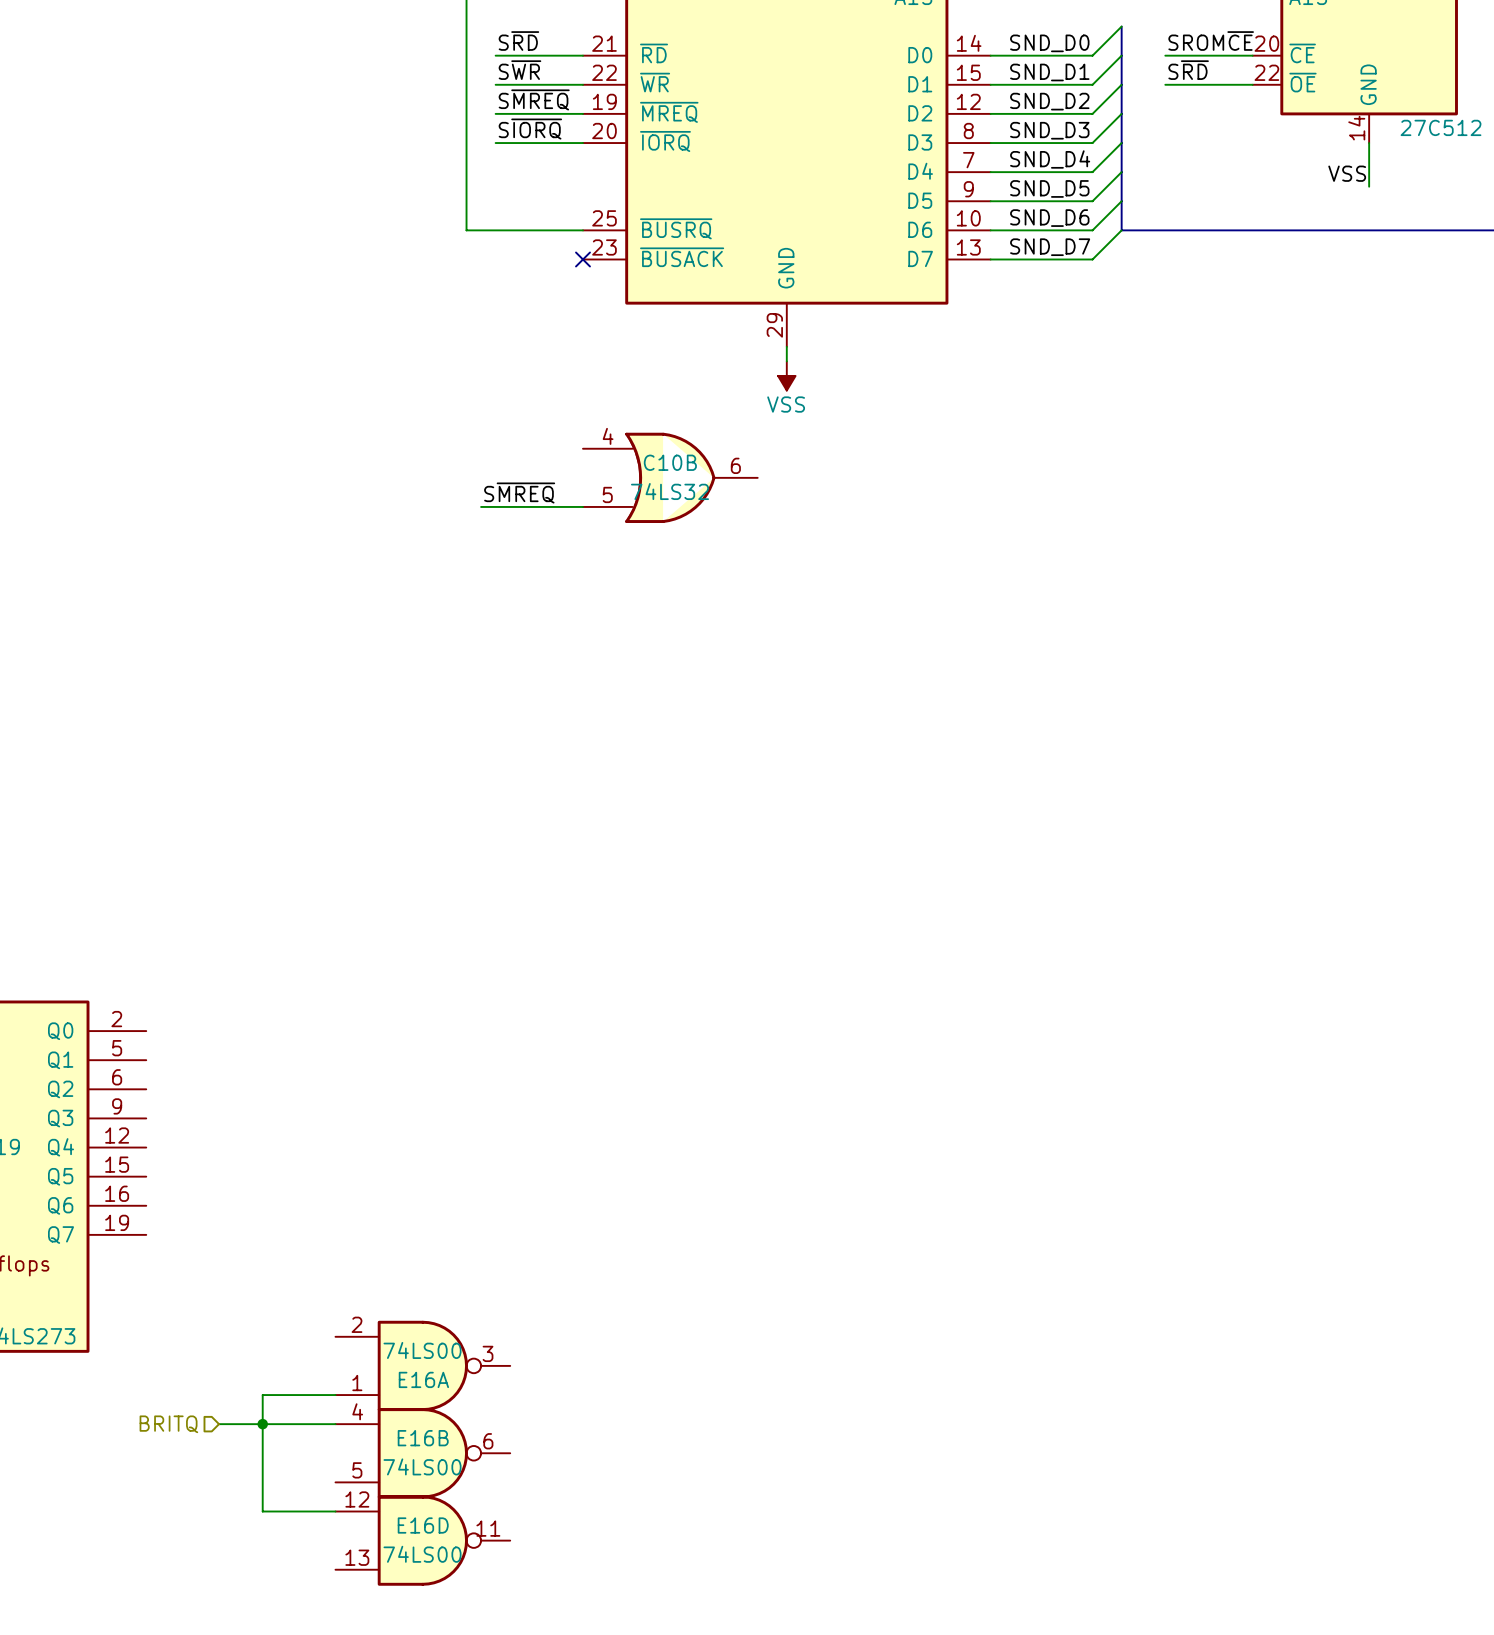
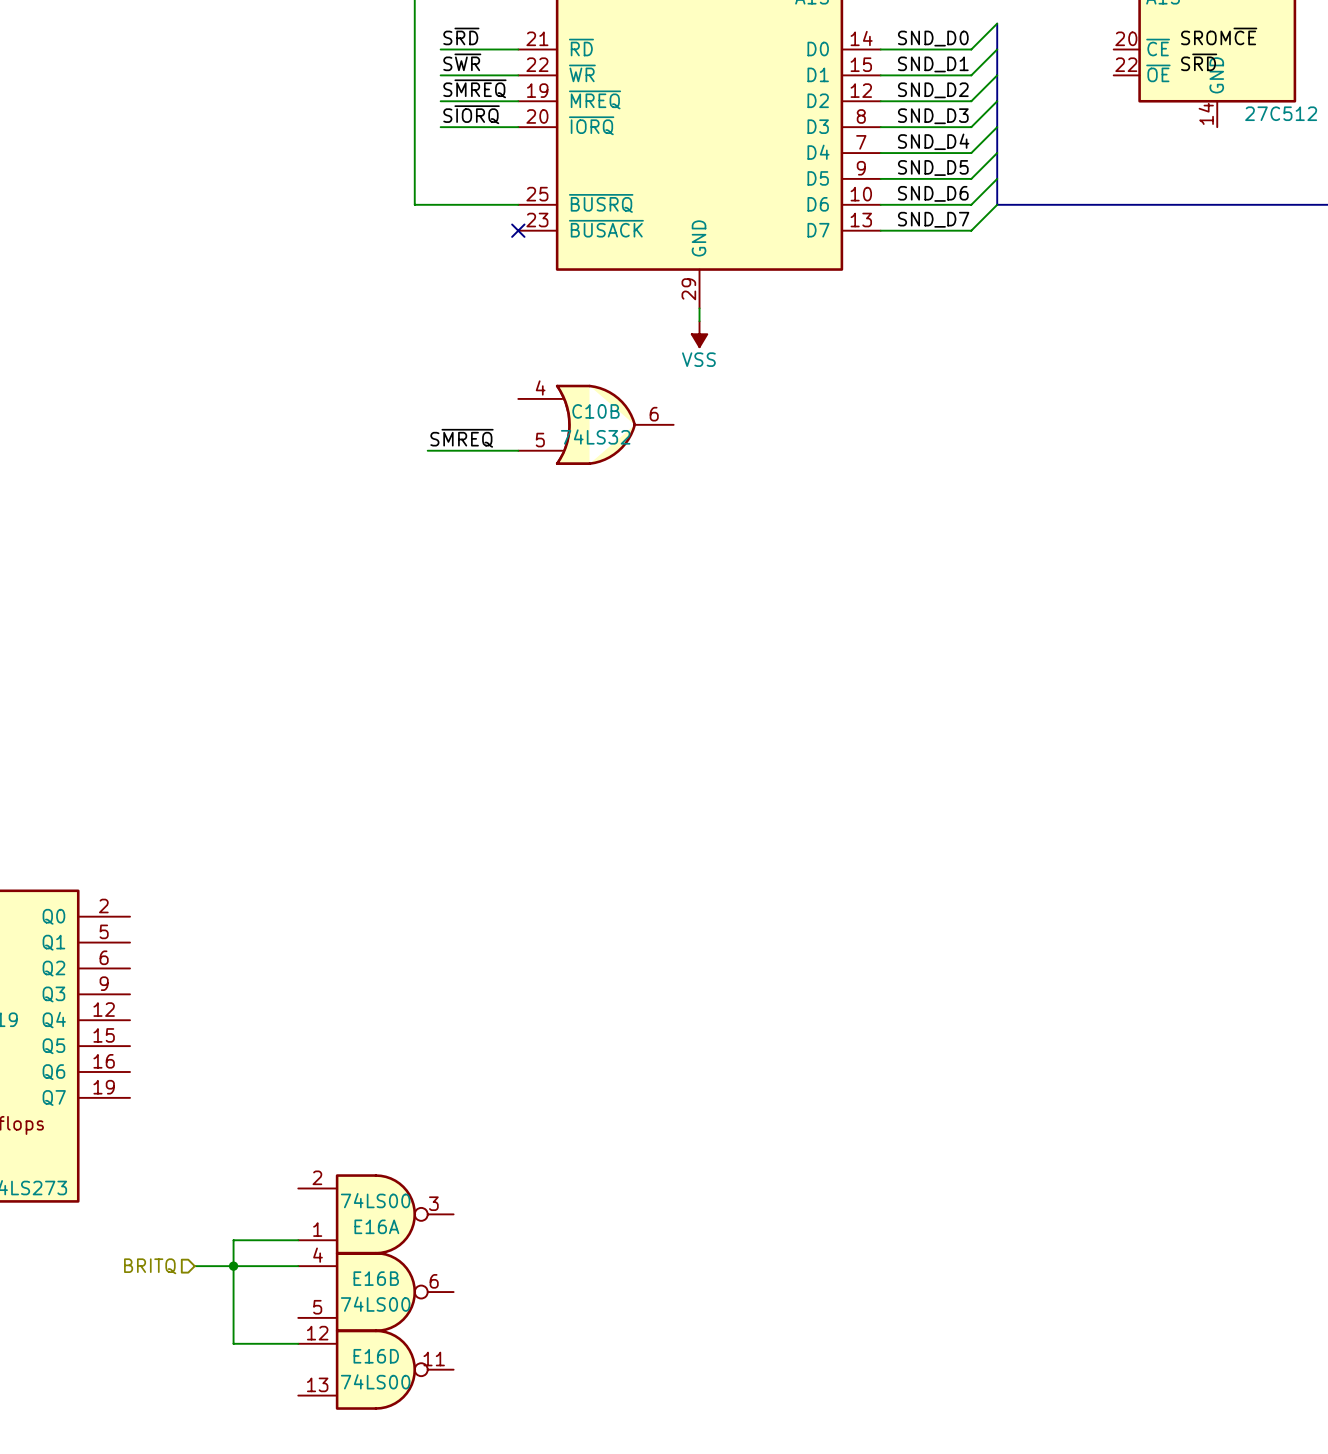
label position: SROM~{CE} (1211, 41) -> SROM~{CE} (1219, 36)
wire: (1165, 55) (1252, 55) -> none
label position: S~{RD} (1188, 70) -> S~{RD} (1199, 62)
wire: (1165, 84) (1252, 84) -> none
wire: (1369, 143) (1369, 186) -> none
label: VSS (1347, 173) -> none

